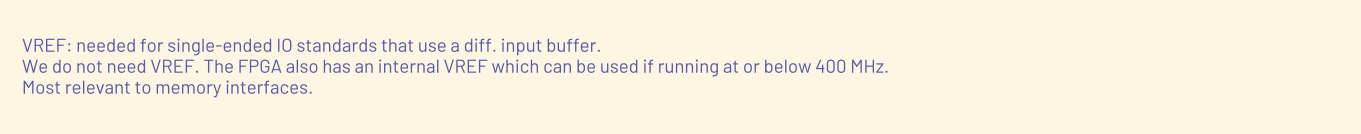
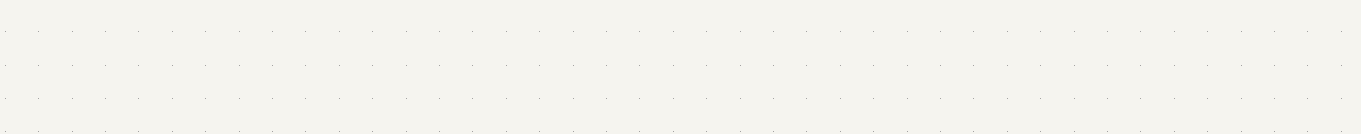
text: VREF: needed for single-ended IO standards that use a diff. input buffer. (311, 47) -> none
text: We do not need VREF. The FPGA also has an internal VREF which can be used if running at or below 400 MHz. (455, 67) -> none
text: Most relevant to memory interfaces. (167, 88) -> none

